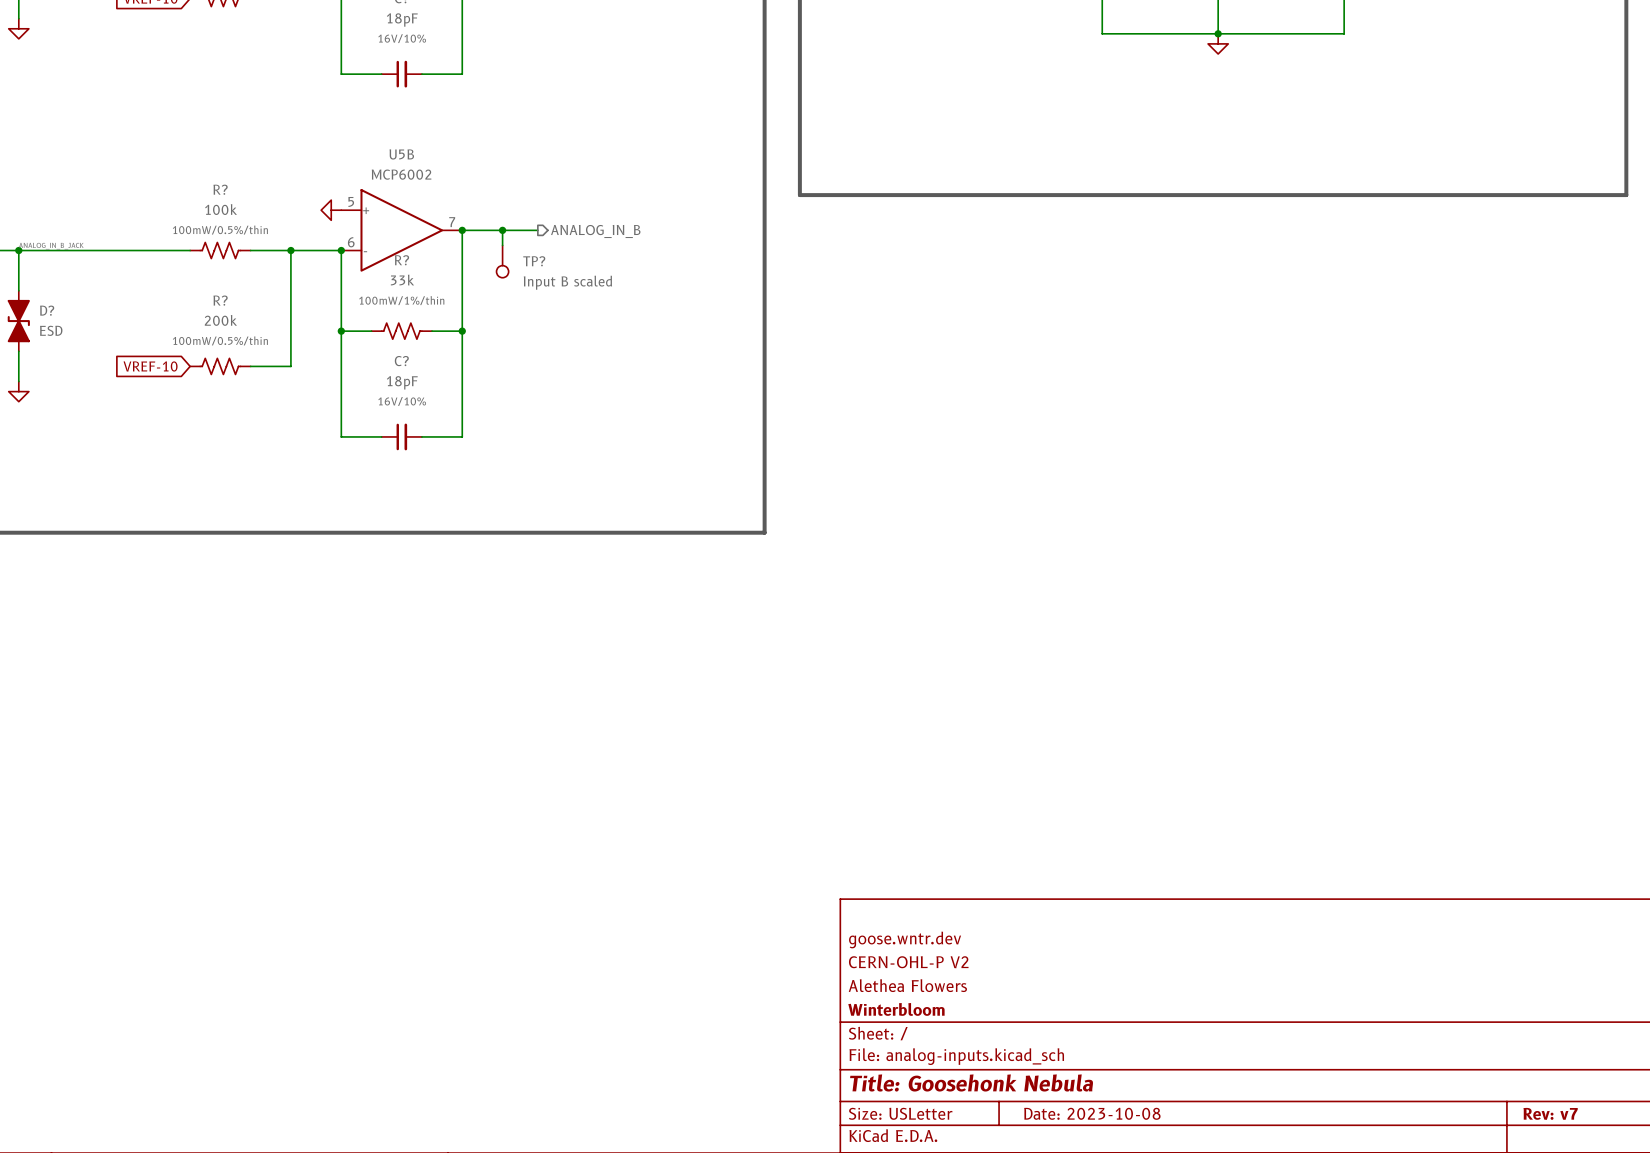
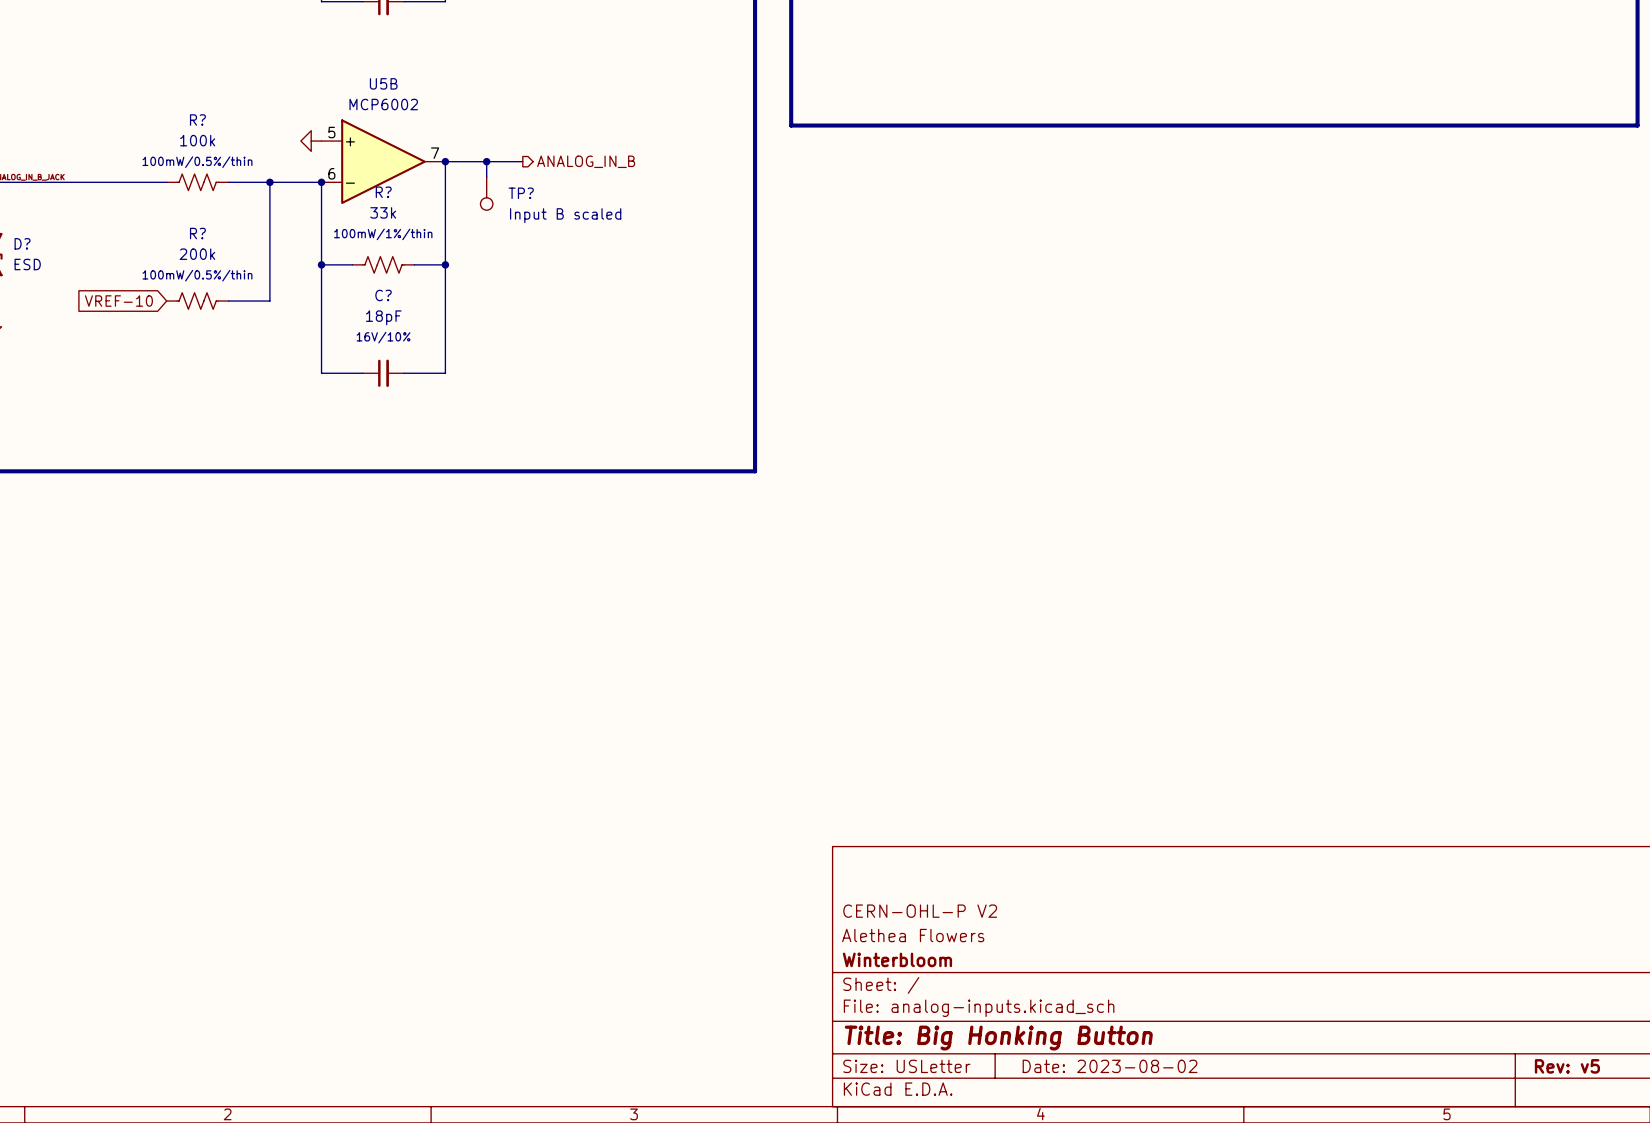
title block: goose.wntr.dev (905, 939) -> none
title block: Title: Goosehonk Nebula (971, 1082) -> Title: Big Honking Button (998, 1038)
title block: Date: 2023-10-08 (1092, 1113) -> Date: 2023-08-02 (1110, 1066)
title block: Rev: v7 (1550, 1113) -> Rev: v5 (1567, 1066)

